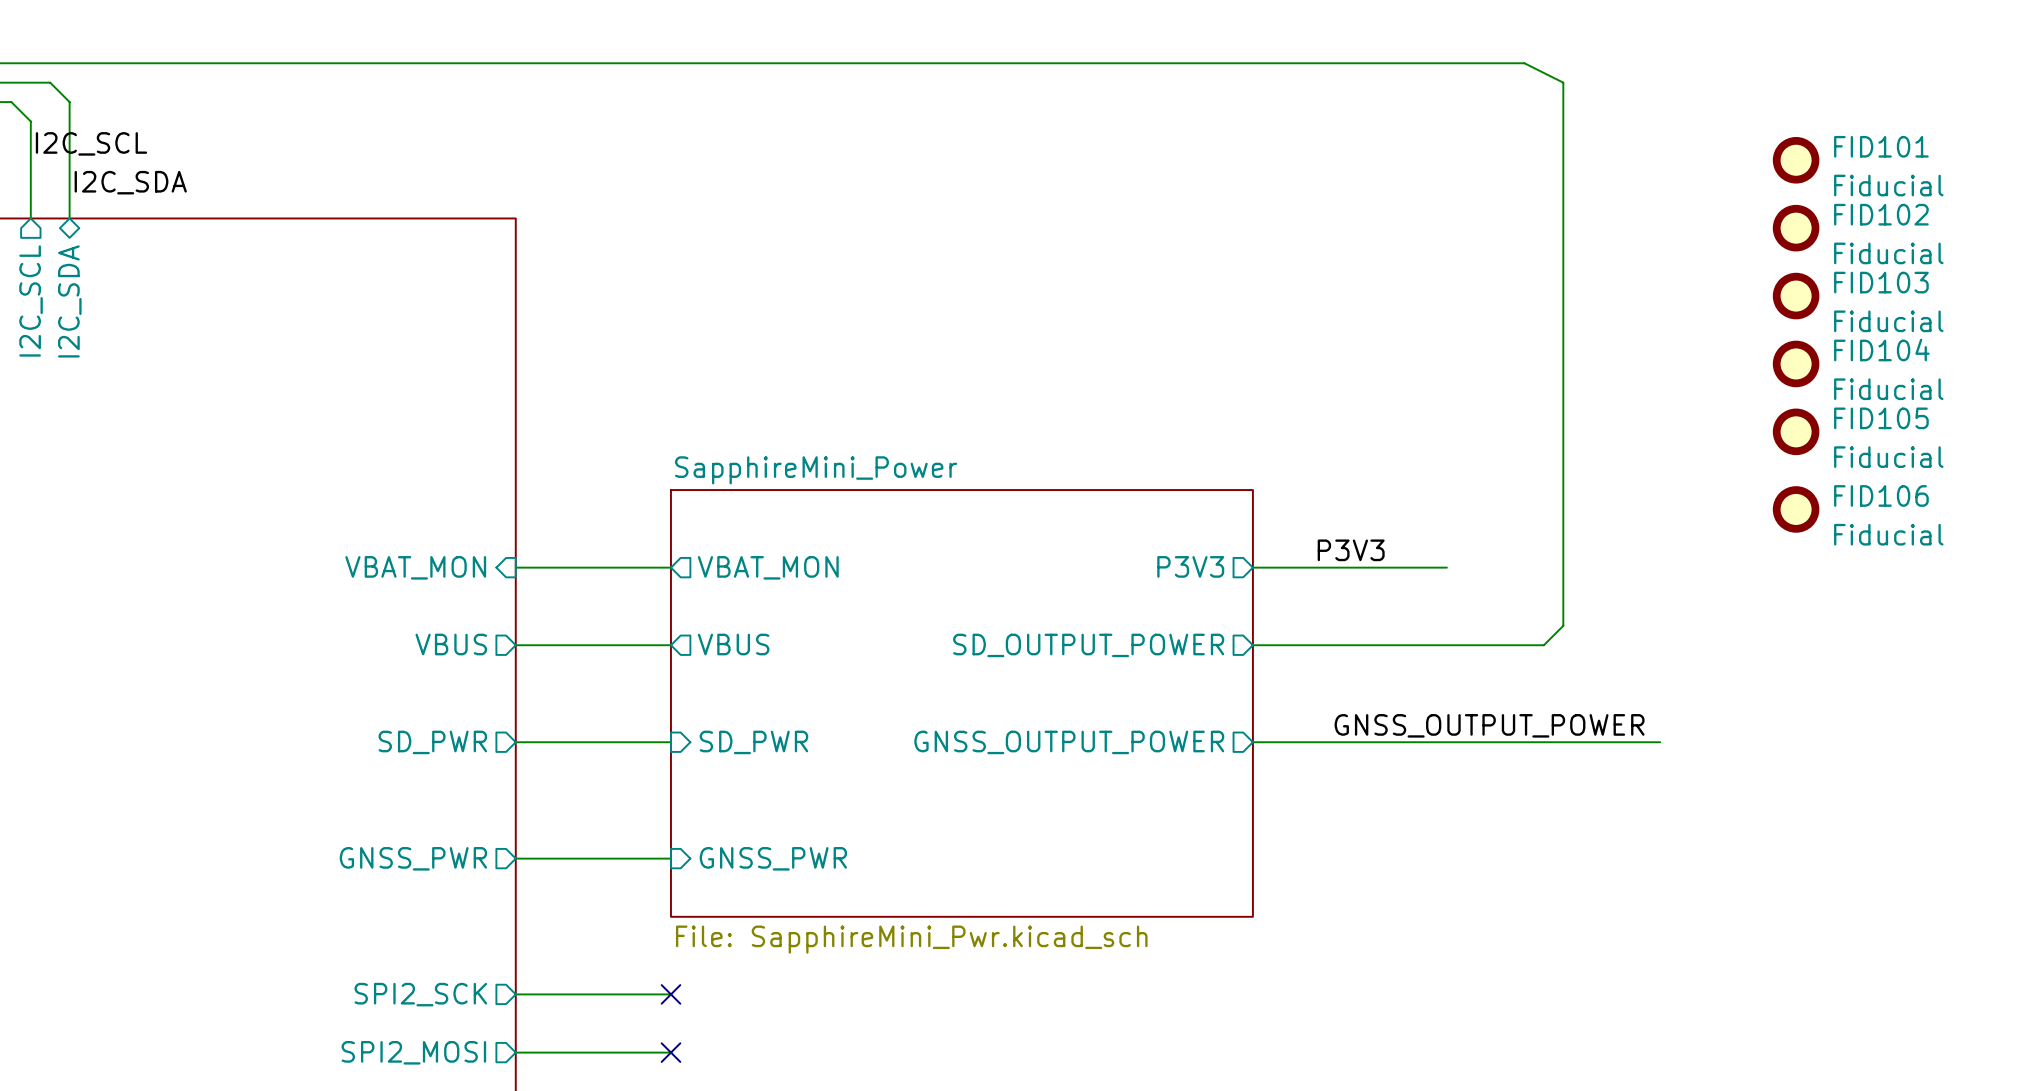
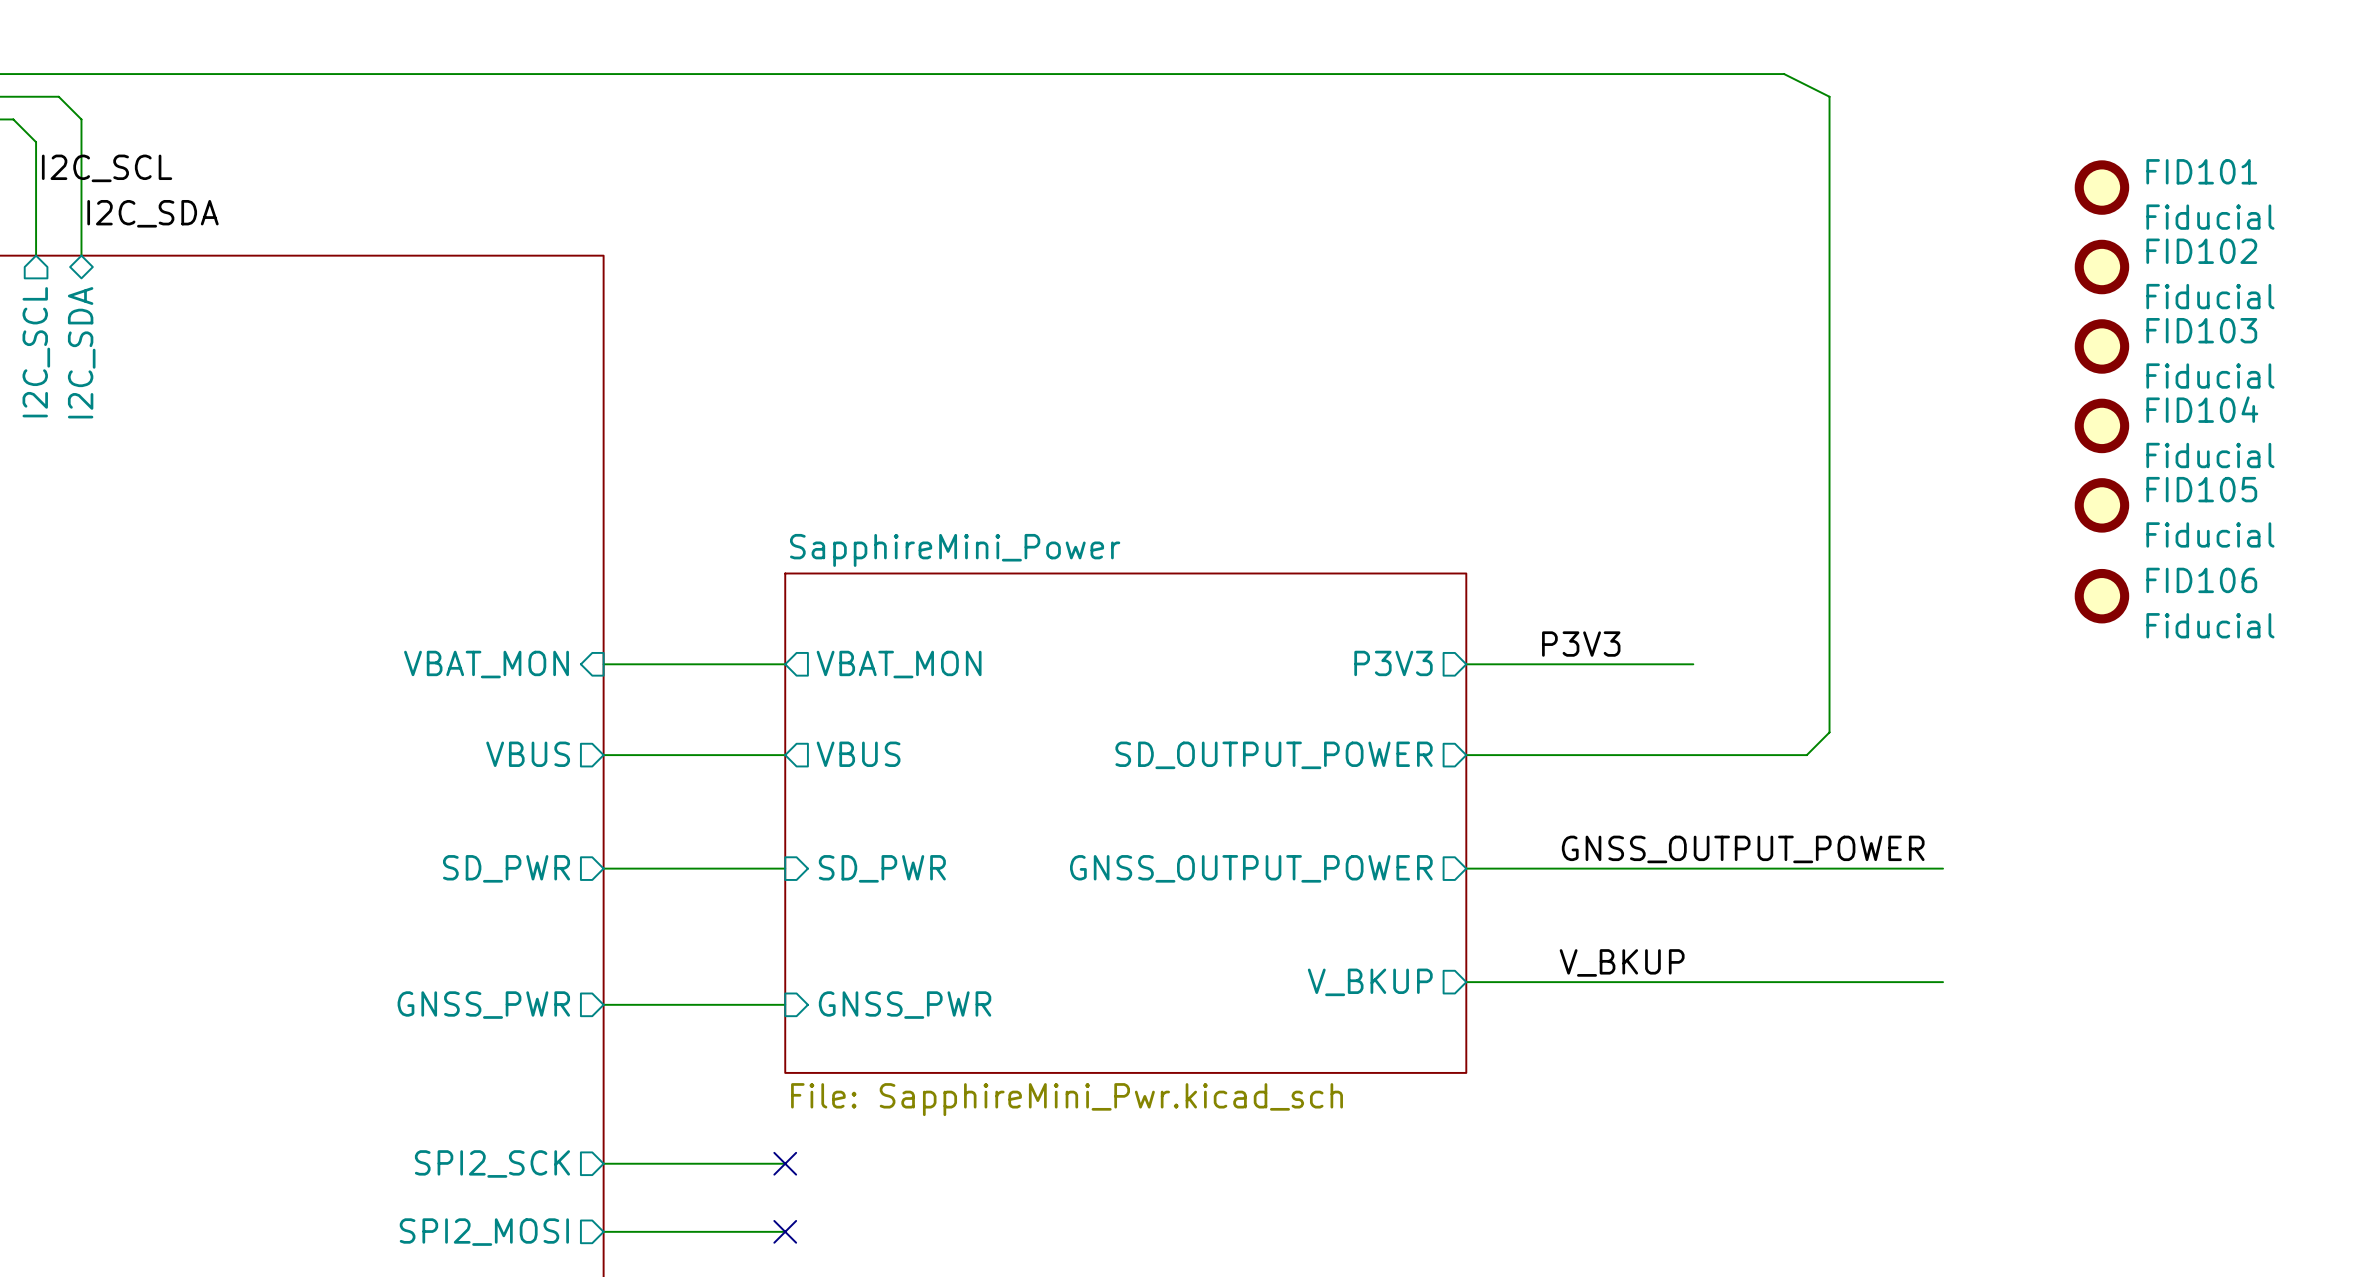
label: none -> V_BKUP (1622, 962)
sheet pin: none -> V_BKUP (1370, 982)
wire: none -> (1466, 982) (1943, 982)

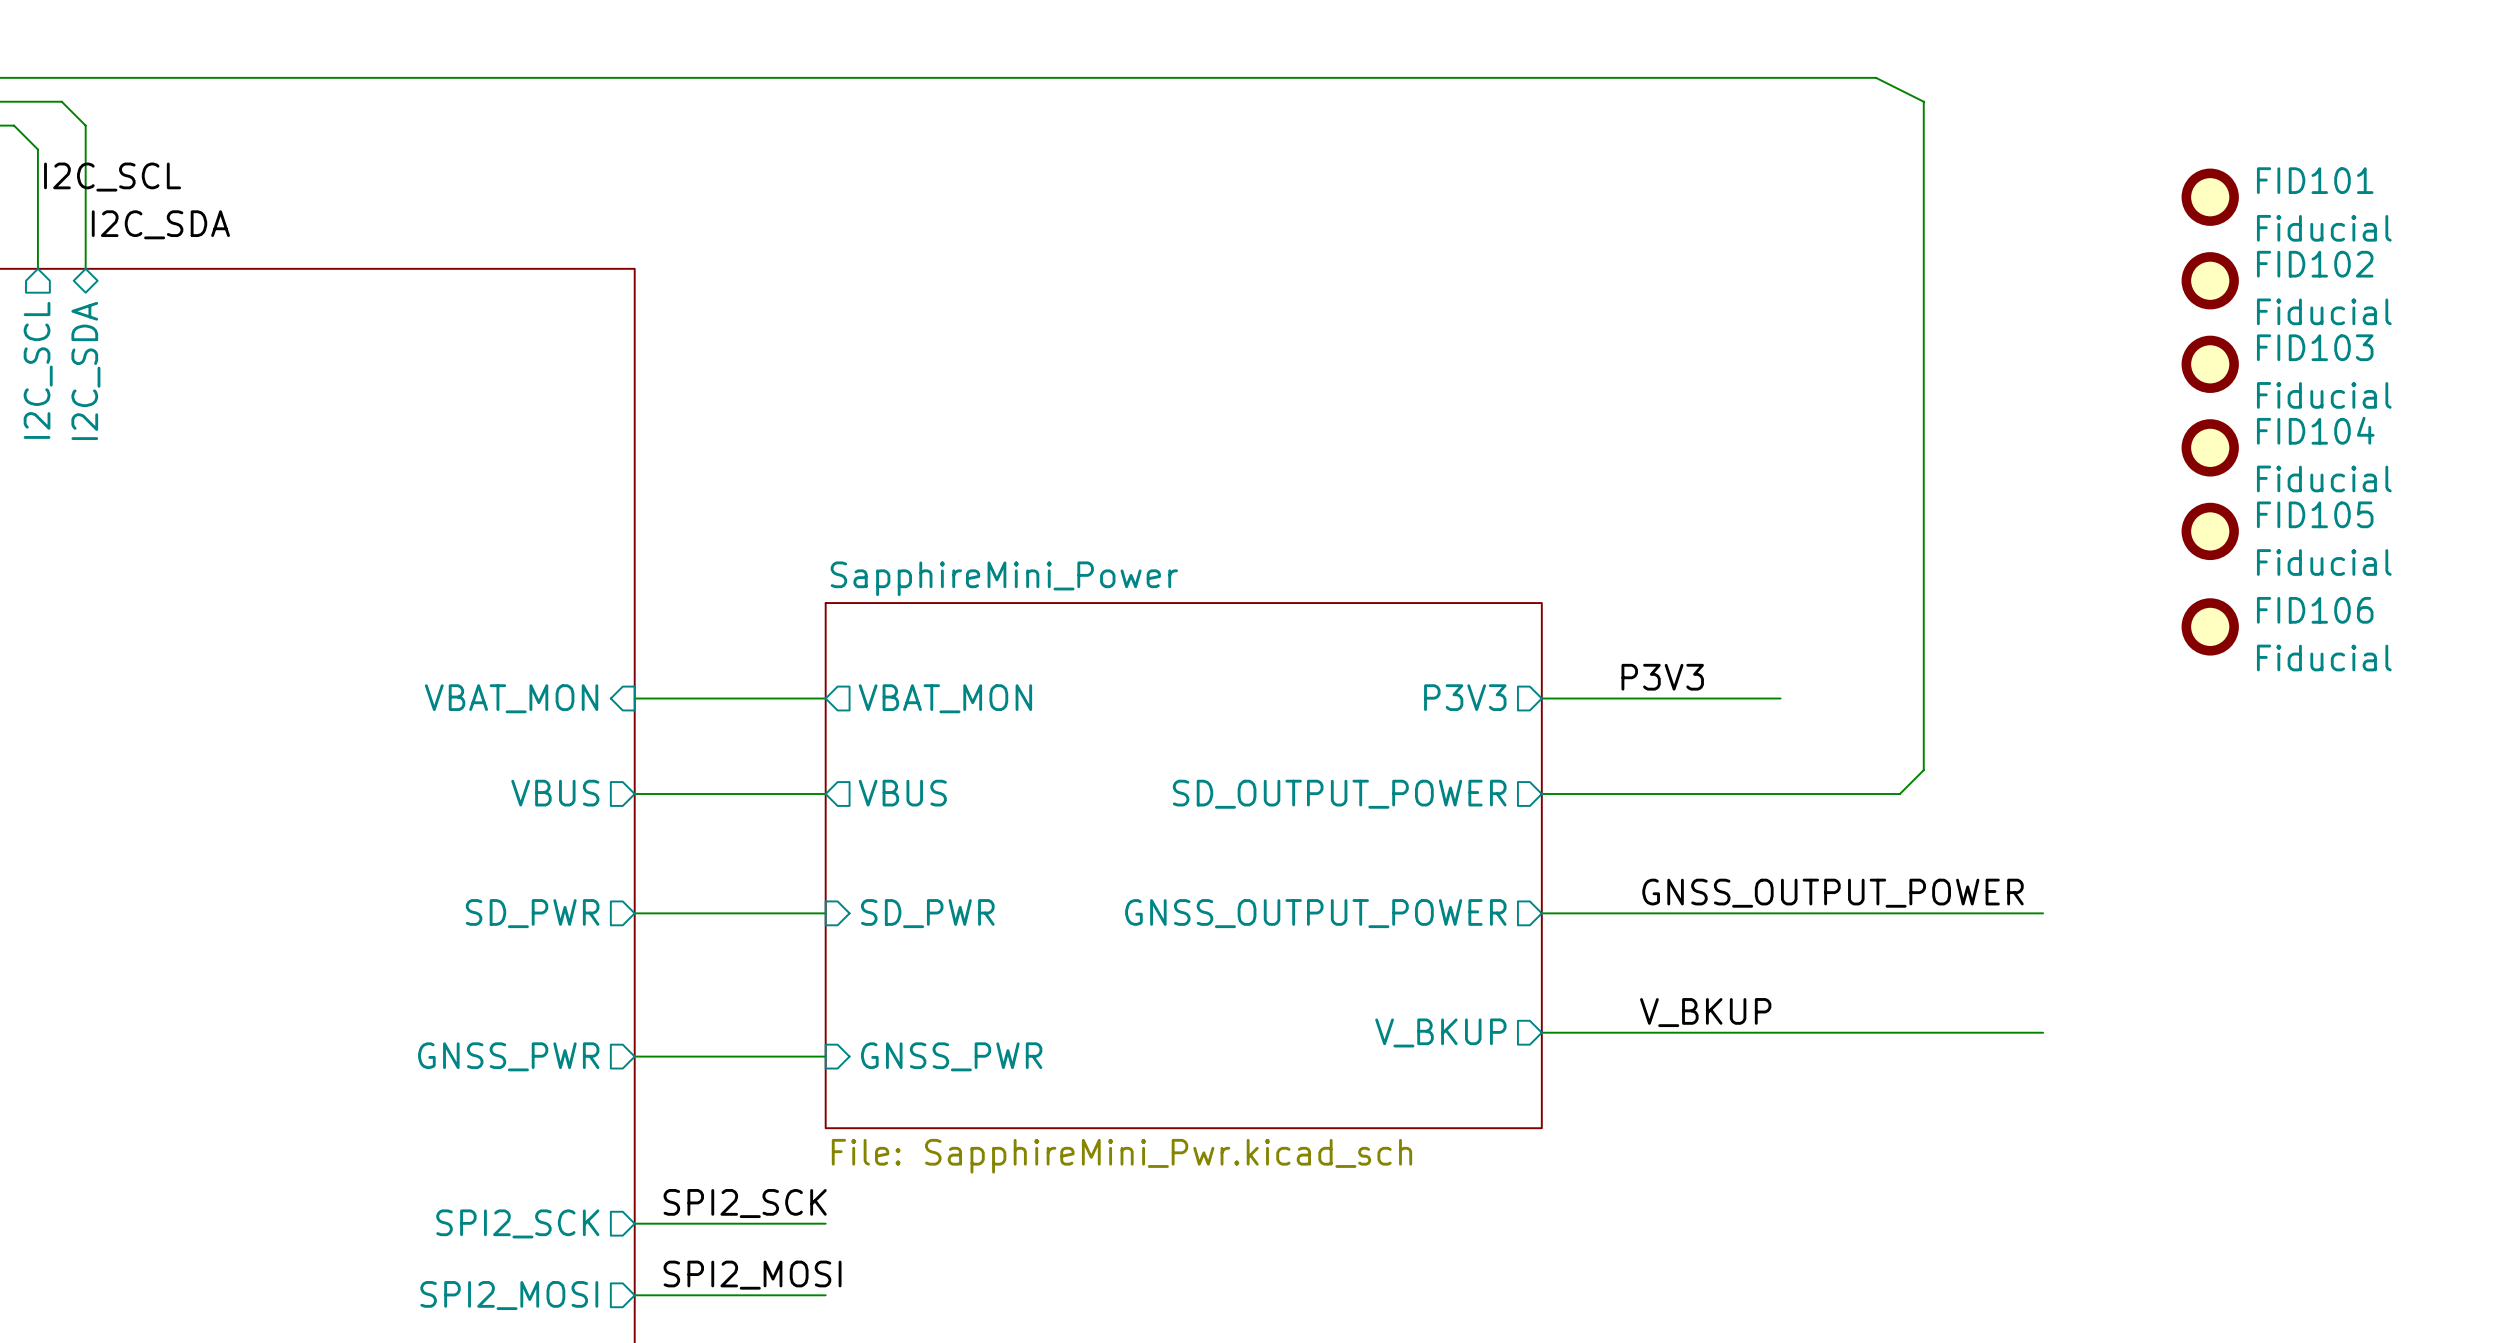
label: none -> SPI2_SCK (745, 1203)
no-connect mark: (785, 1163) -> none
label: none -> SPI2_MOSI (752, 1275)
no-connect mark: (785, 1231) -> none

